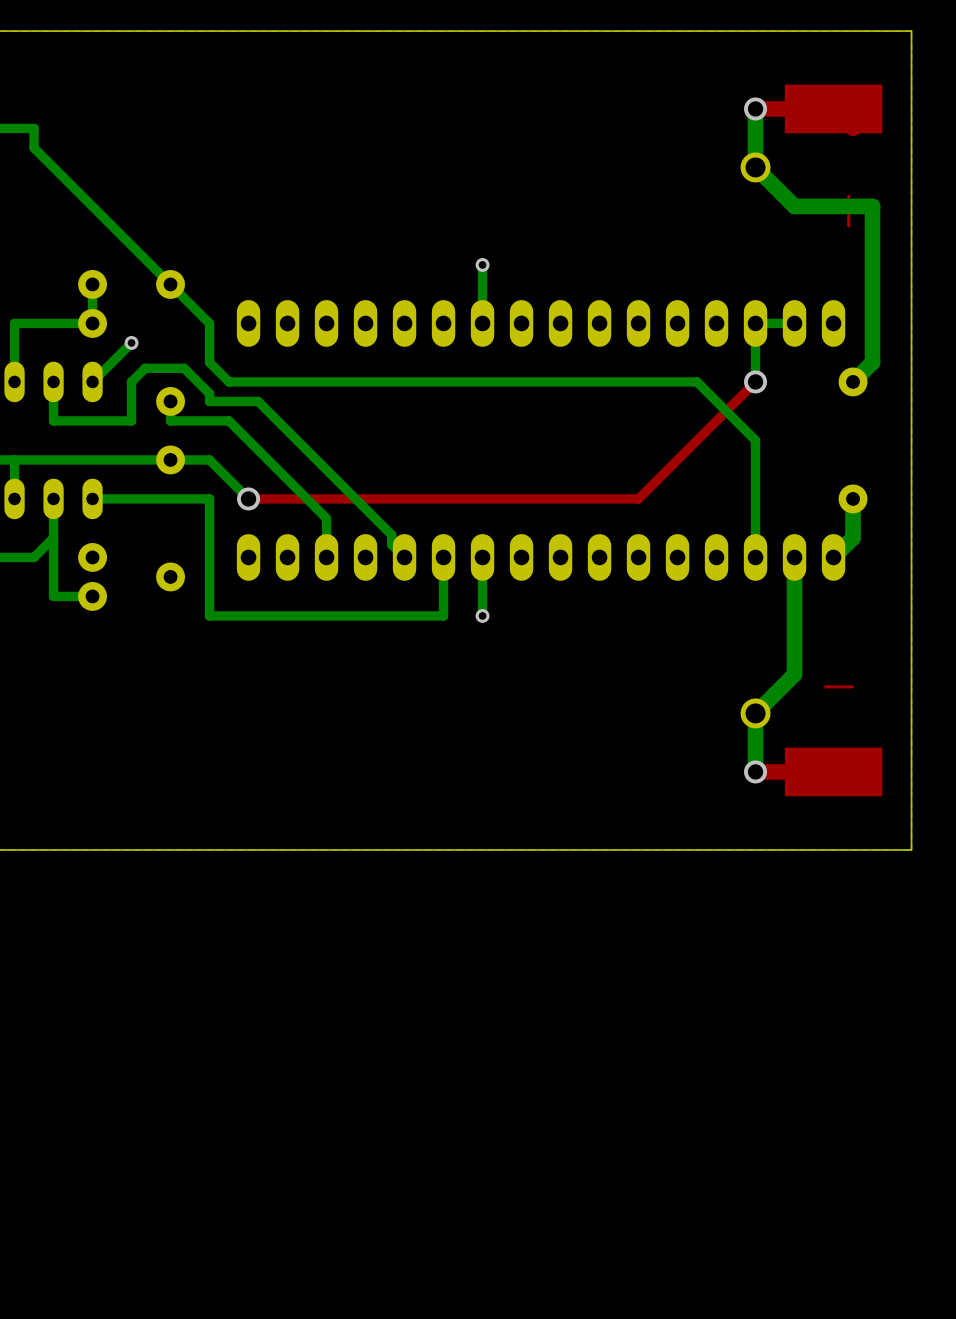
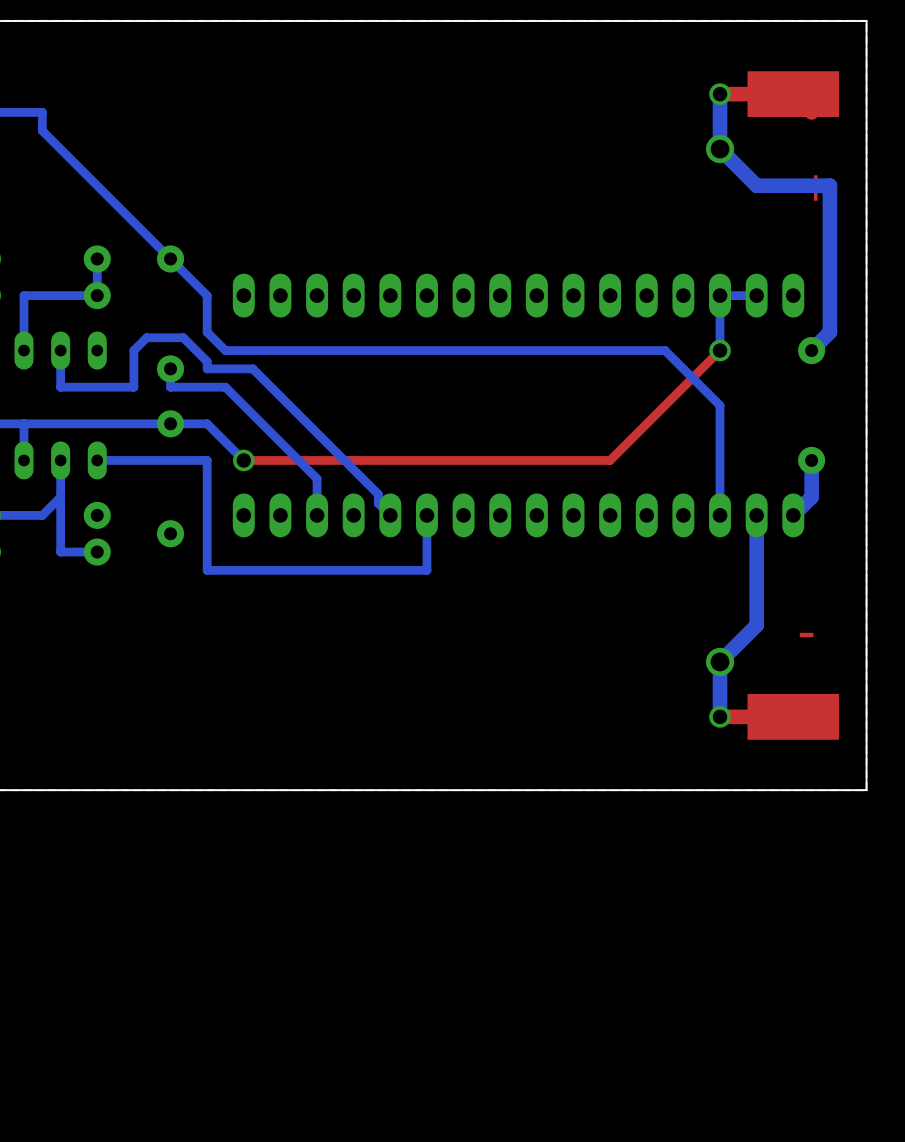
bottom track: (482, 264) (482, 323) -> none
via: (482, 264) -> none
bottom track: (131, 342) (92, 381) -> none
via: (131, 342) -> none
bottom track: (482, 557) (482, 615) -> none
via: (482, 615) -> none

